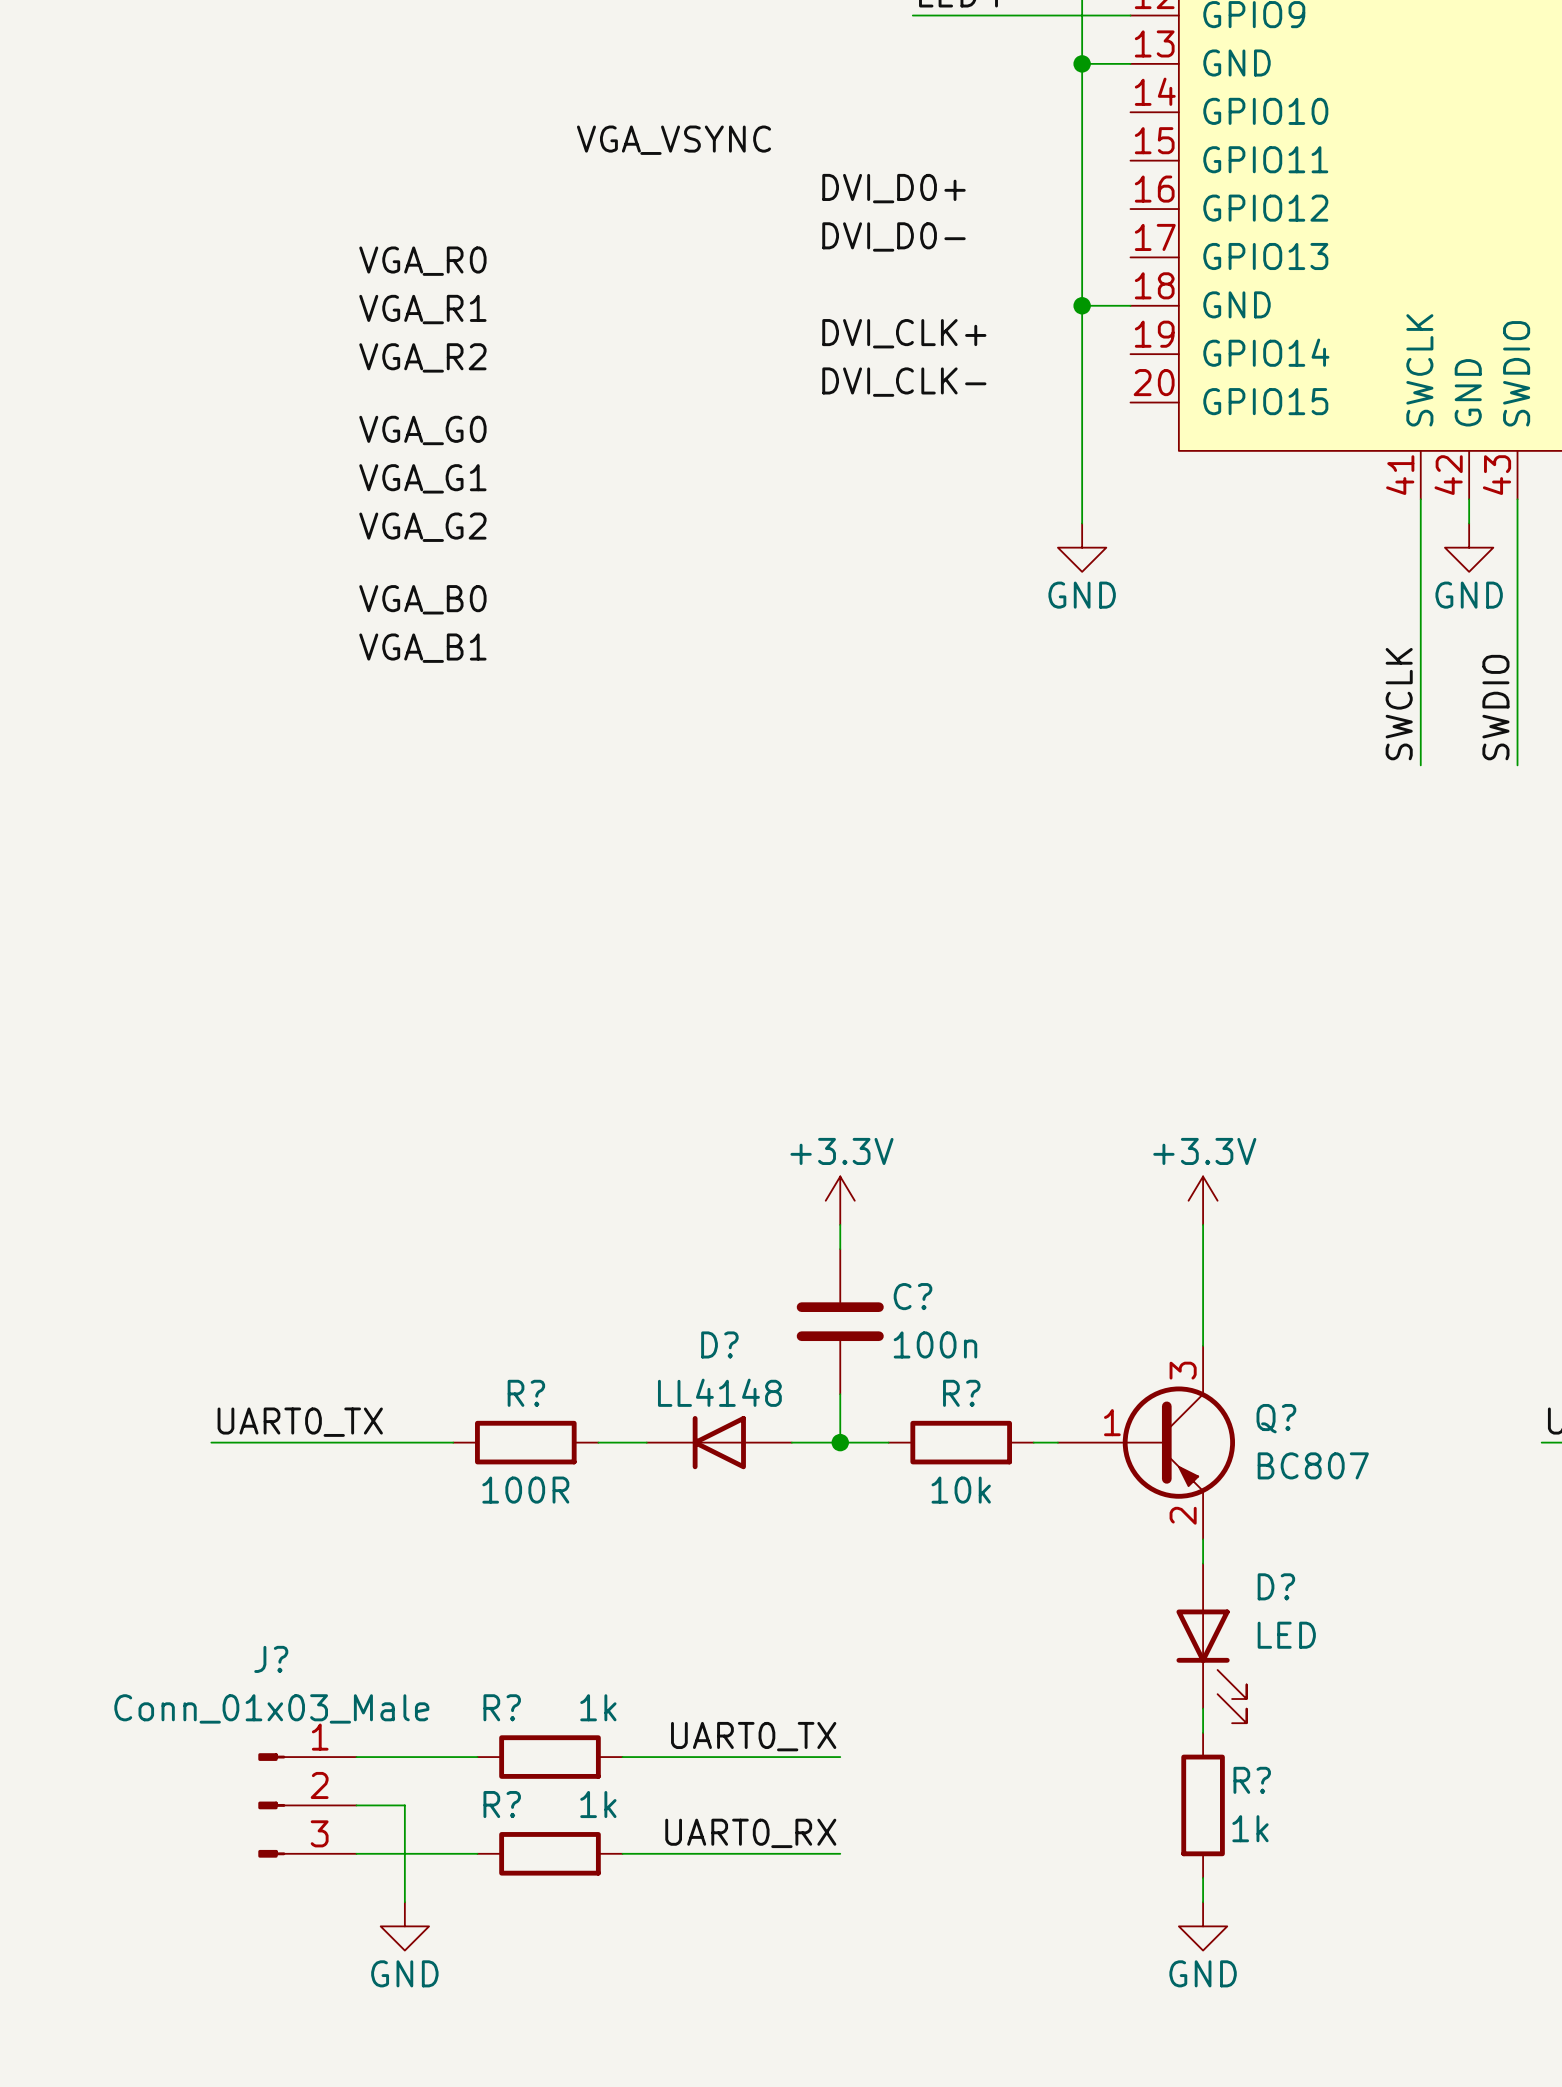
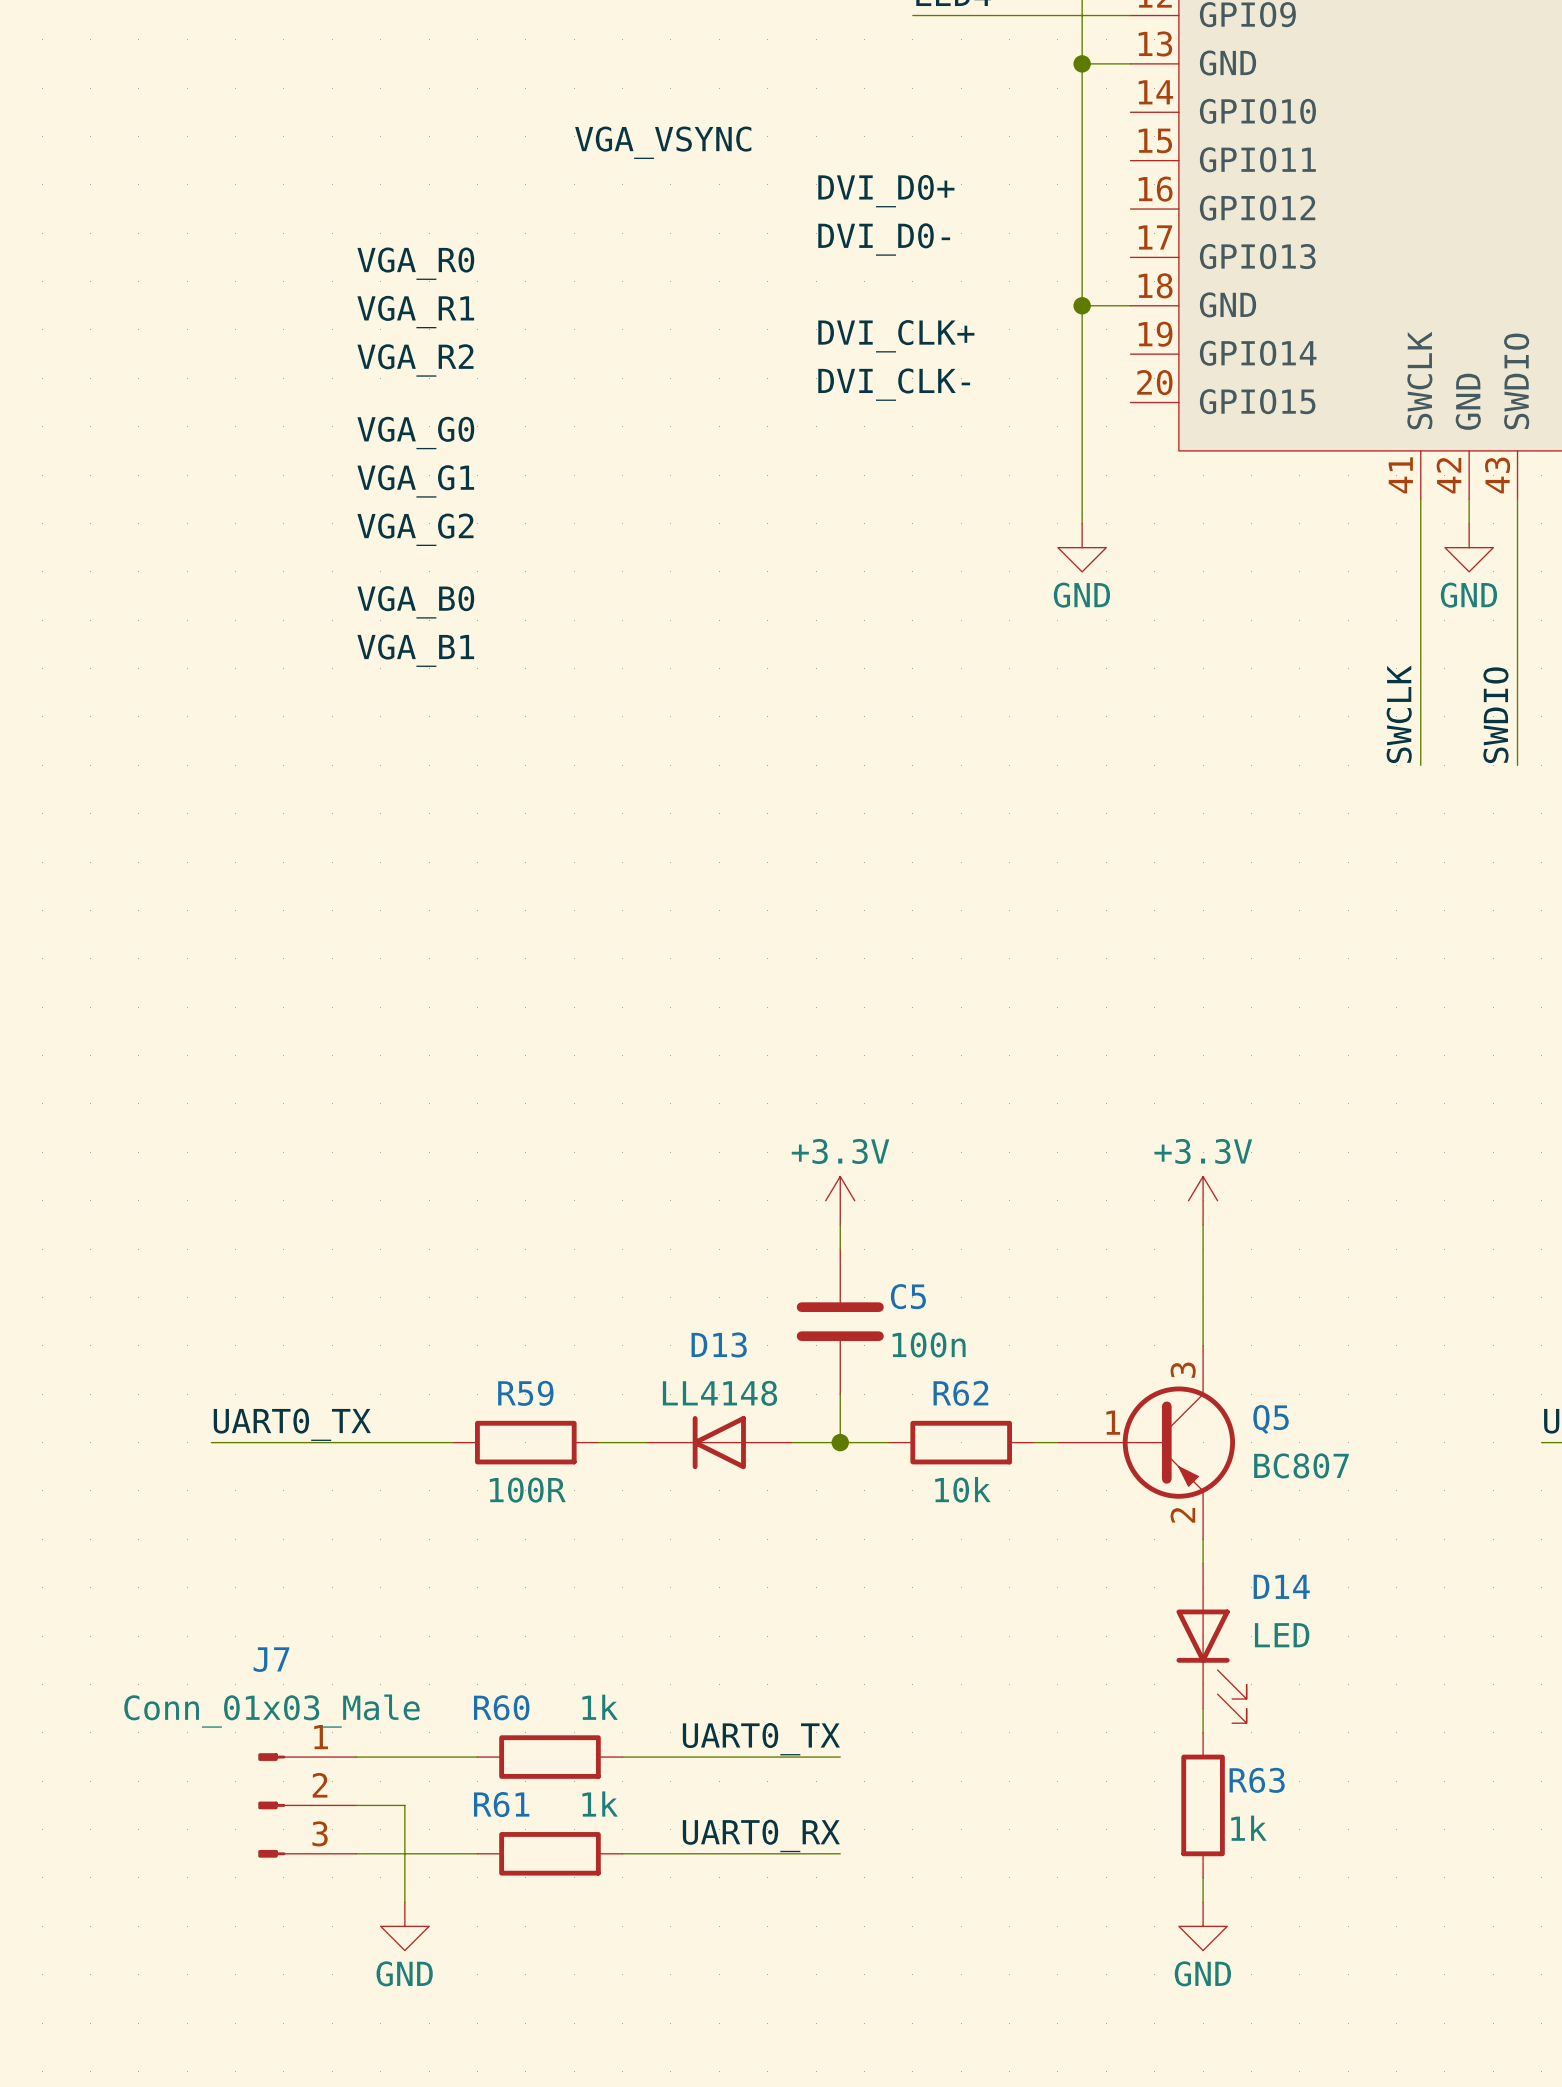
C? name: C? (913, 1296) -> C5 (908, 1296)
D? name: D? (719, 1344) -> D13 (719, 1344)
R? name: R? (526, 1393) -> R59 (525, 1393)
R? name: R? (961, 1393) -> R62 (960, 1393)
Q? name: Q? (1276, 1418) -> Q5 (1271, 1419)
D? name: D? (1276, 1586) -> D14 (1281, 1586)
J? name: J? (271, 1659) -> J7 (271, 1659)
R? name: R? (502, 1707) -> R60 (501, 1707)
R? name: R? (1252, 1780) -> R63 (1257, 1780)
R? name: R? (502, 1804) -> R61 (501, 1804)

